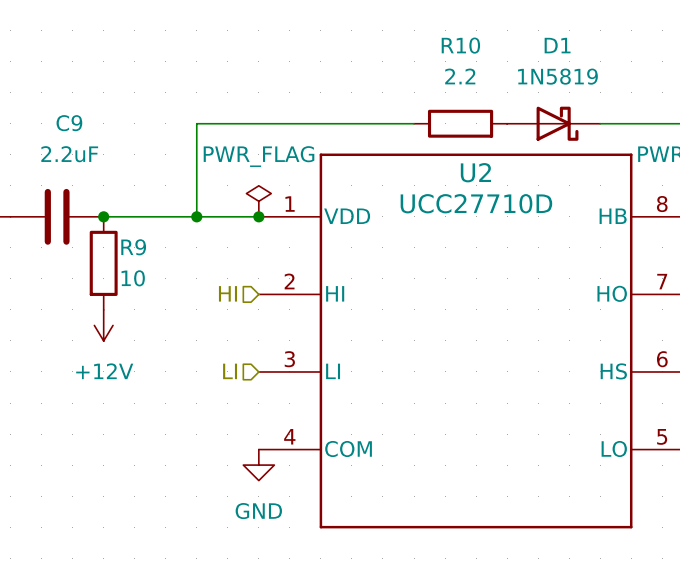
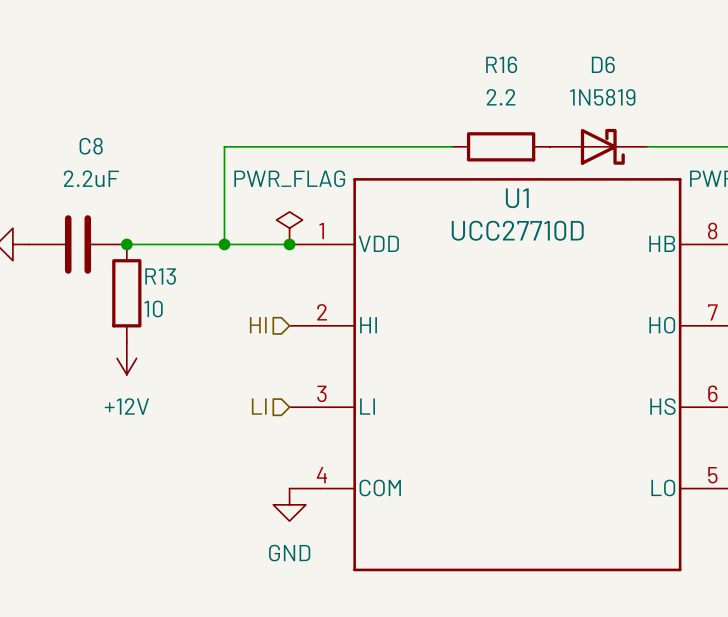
R10 name: R10 (460, 45) -> R16 (501, 64)
D1 name: D1 (557, 45) -> D6 (603, 64)
C9 name: C9 (69, 123) -> C8 (91, 146)
U2 name: U2 (475, 172) -> U1 (517, 198)
R9 name: R9 (133, 247) -> R13 (160, 276)

